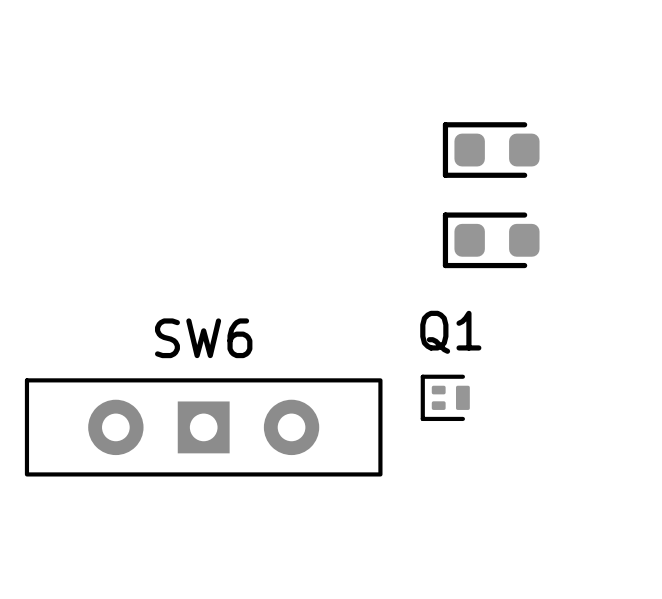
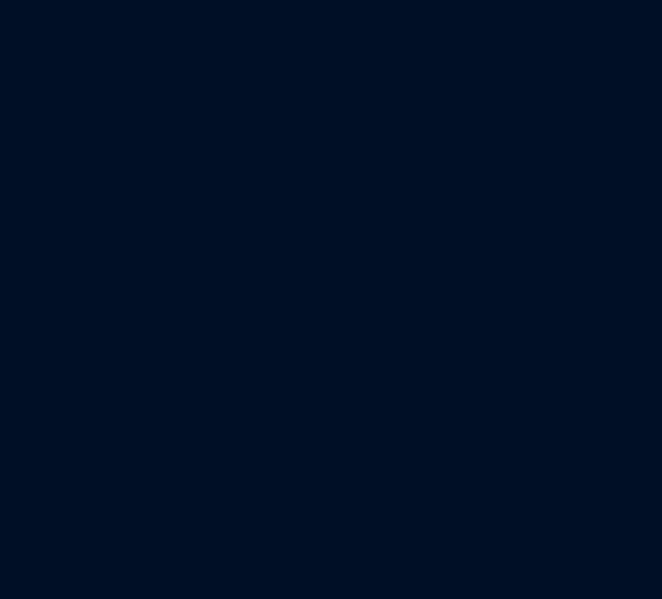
part: (491, 150) -> none
part: (491, 240) -> none
Q1: (445, 397) -> none
SW6: (203, 427) -> none

